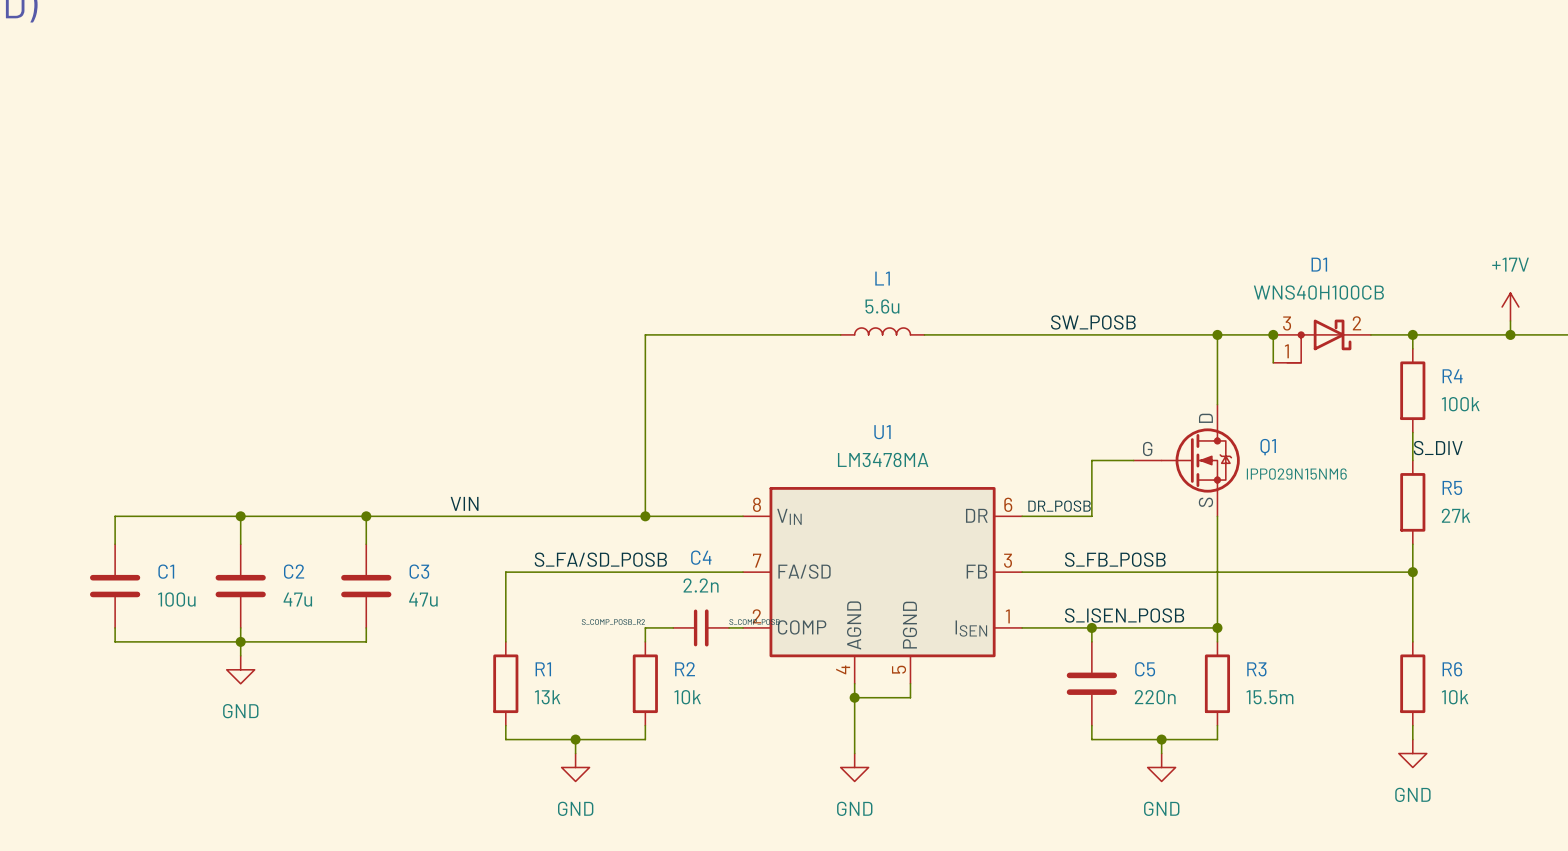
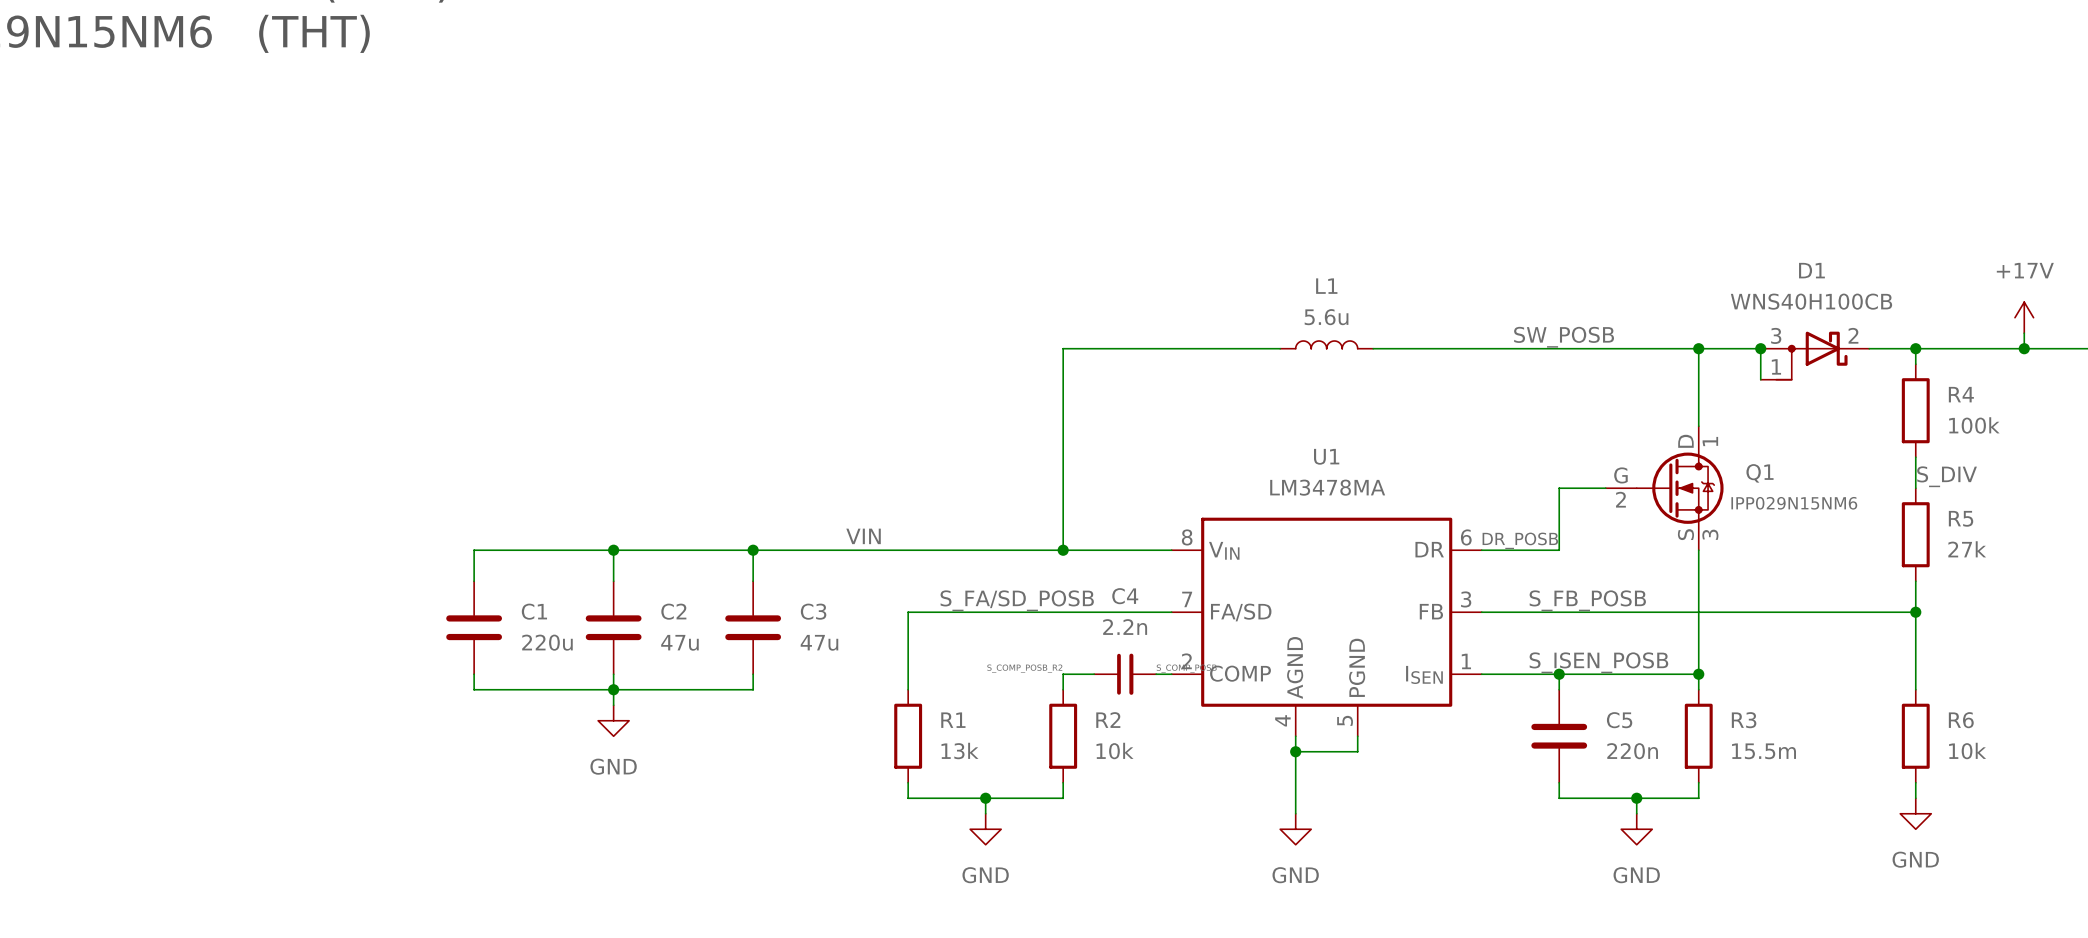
Q1 pin number: none -> 1 (1710, 441)
Q1 pin number: none -> 2 (1620, 499)
Q1 pin number: none -> 3 (1710, 534)
C1 value: 100u (176, 599) -> 220u (547, 642)

